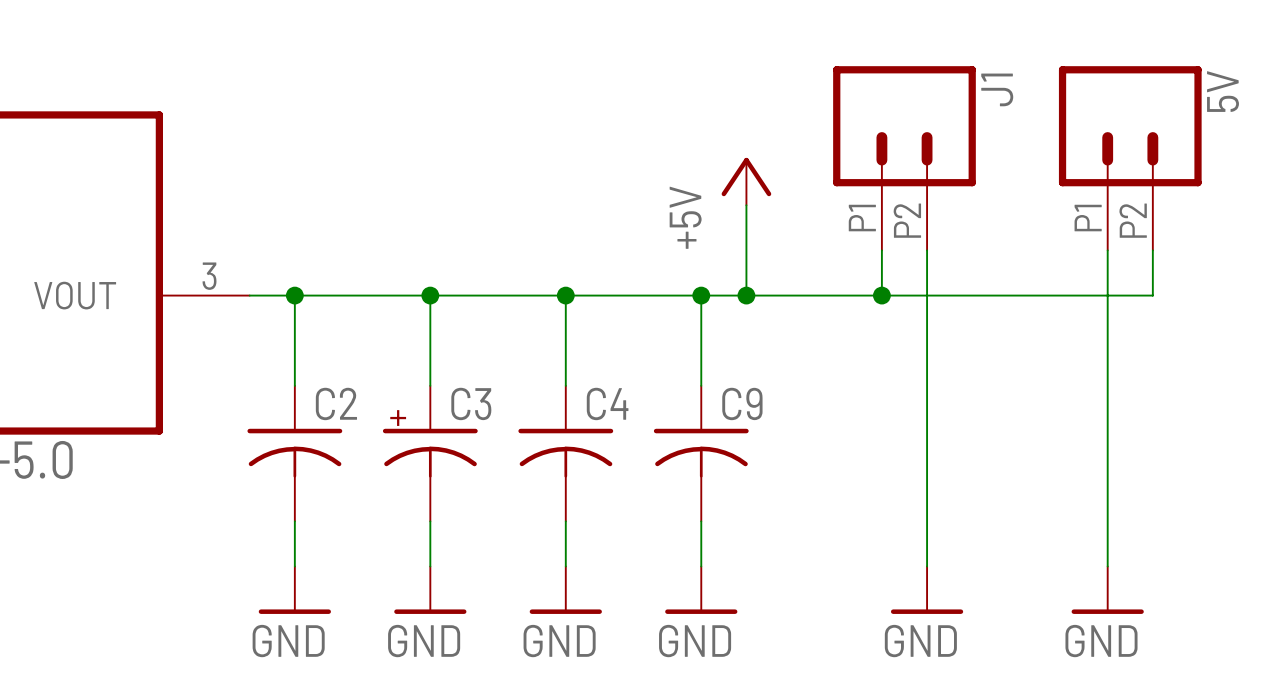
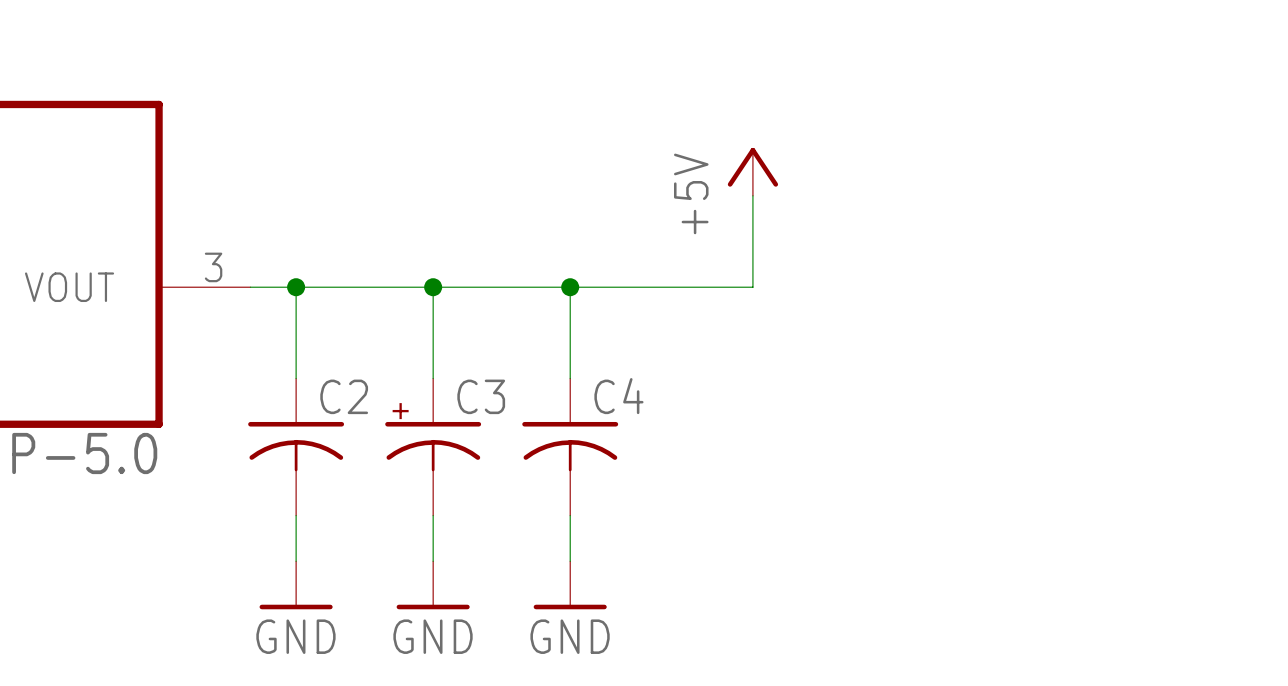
J1: (904, 158) -> none
5V: (1130, 158) -> none
wire: (881, 250) (881, 295) -> none
wire: (927, 250) (927, 566) -> none
wire: (1107, 250) (1107, 566) -> none
wire: (1152, 250) (1152, 295) (746, 295) -> none
wire: (701, 295) (701, 385) -> none
junction: (701, 295) -> none
junction: (746, 295) -> none
junction: (881, 295) -> none
C9: (701, 453) -> none
wire: (701, 521) (701, 566) -> none
power symbol: GND (701, 590) -> none
power symbol: GND (927, 590) -> none
power symbol: GND (1107, 590) -> none

